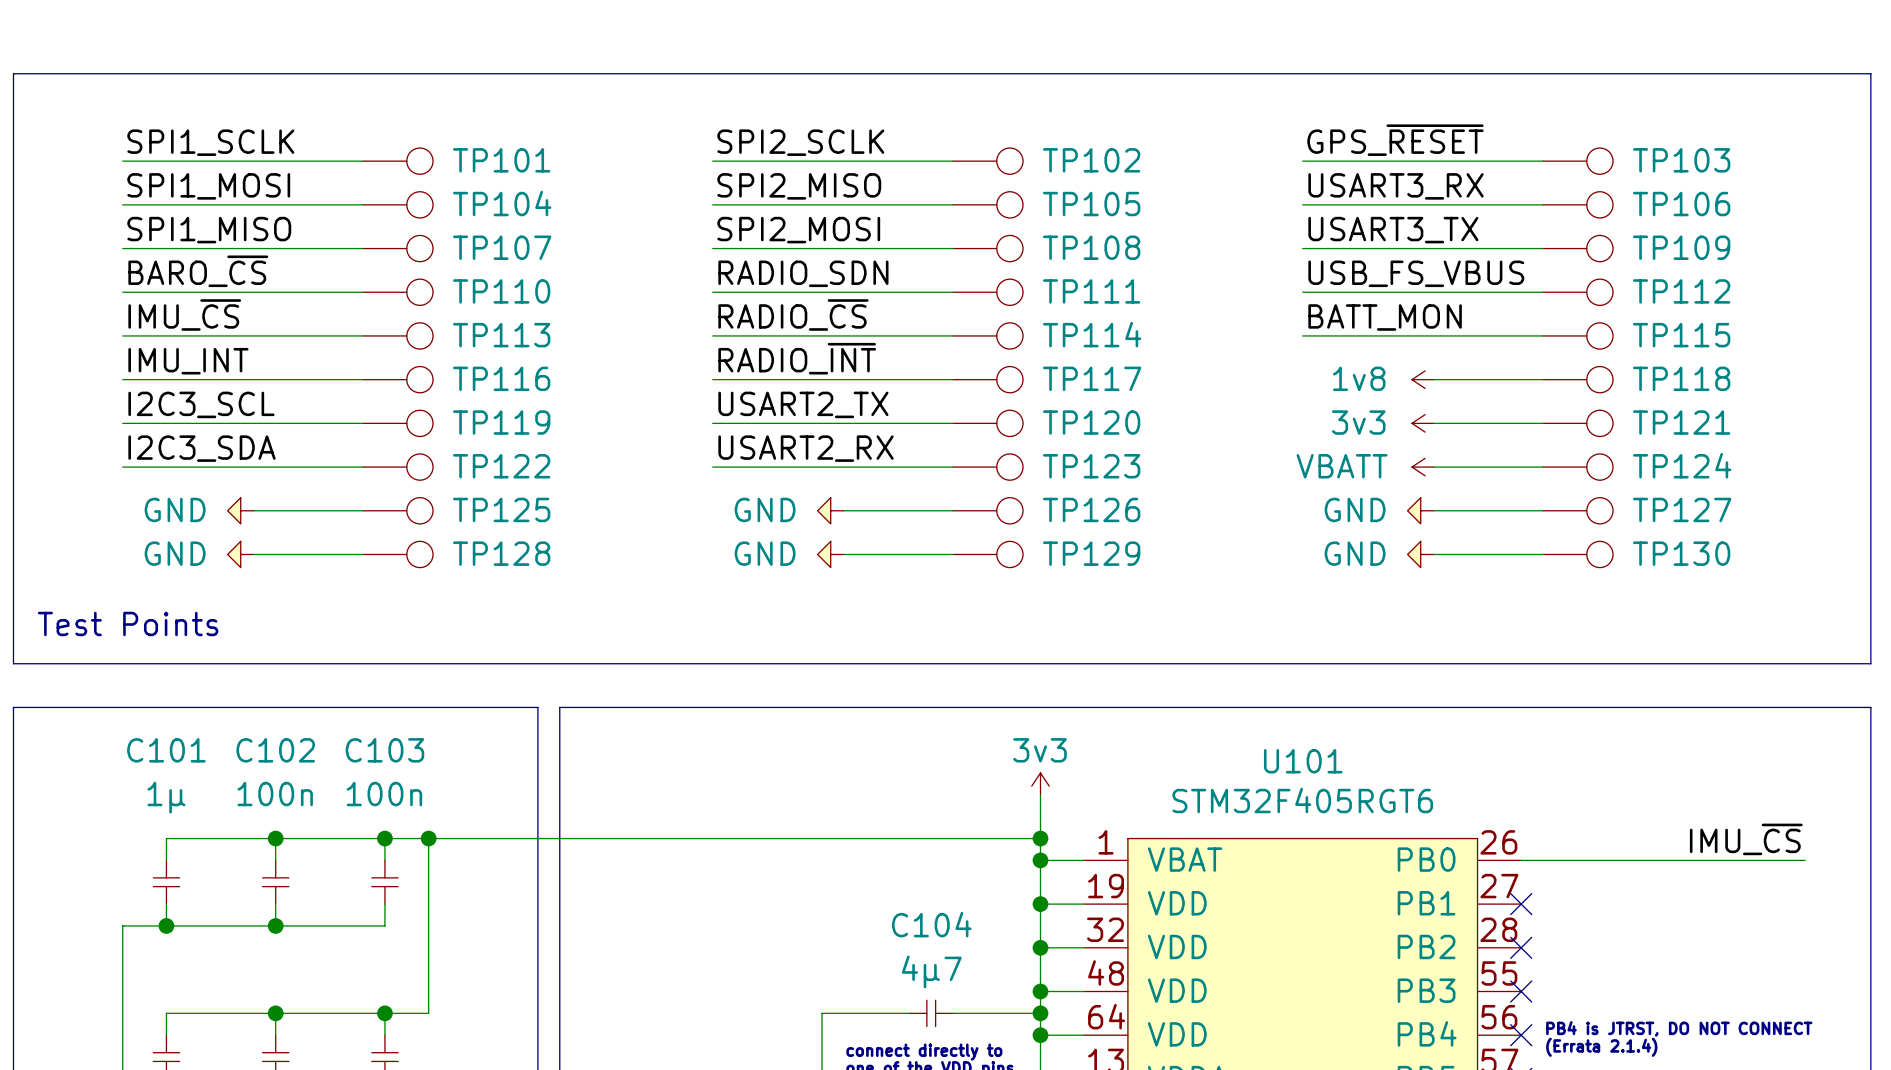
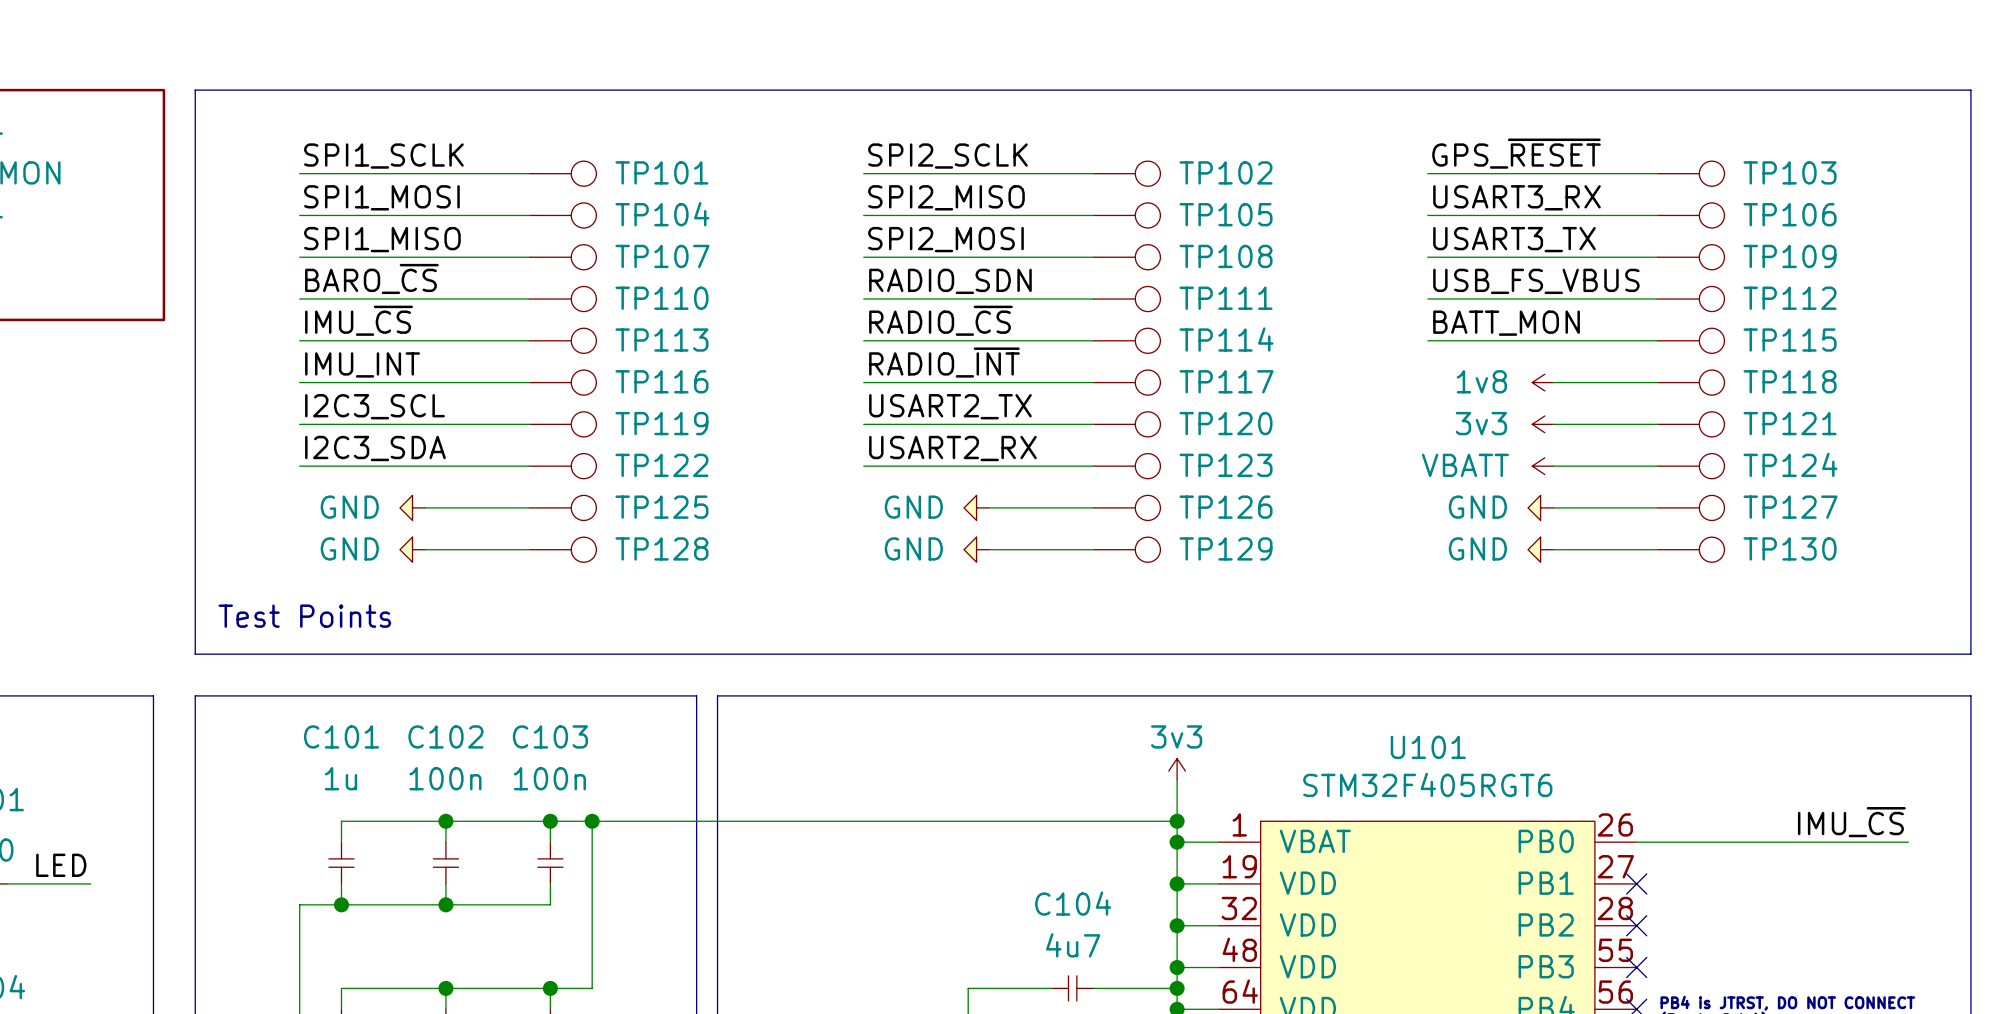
C101 value: 1µ (166, 797) -> 1u (340, 778)
C104 value: 4µ7 (931, 971) -> 4u7 (1073, 945)

